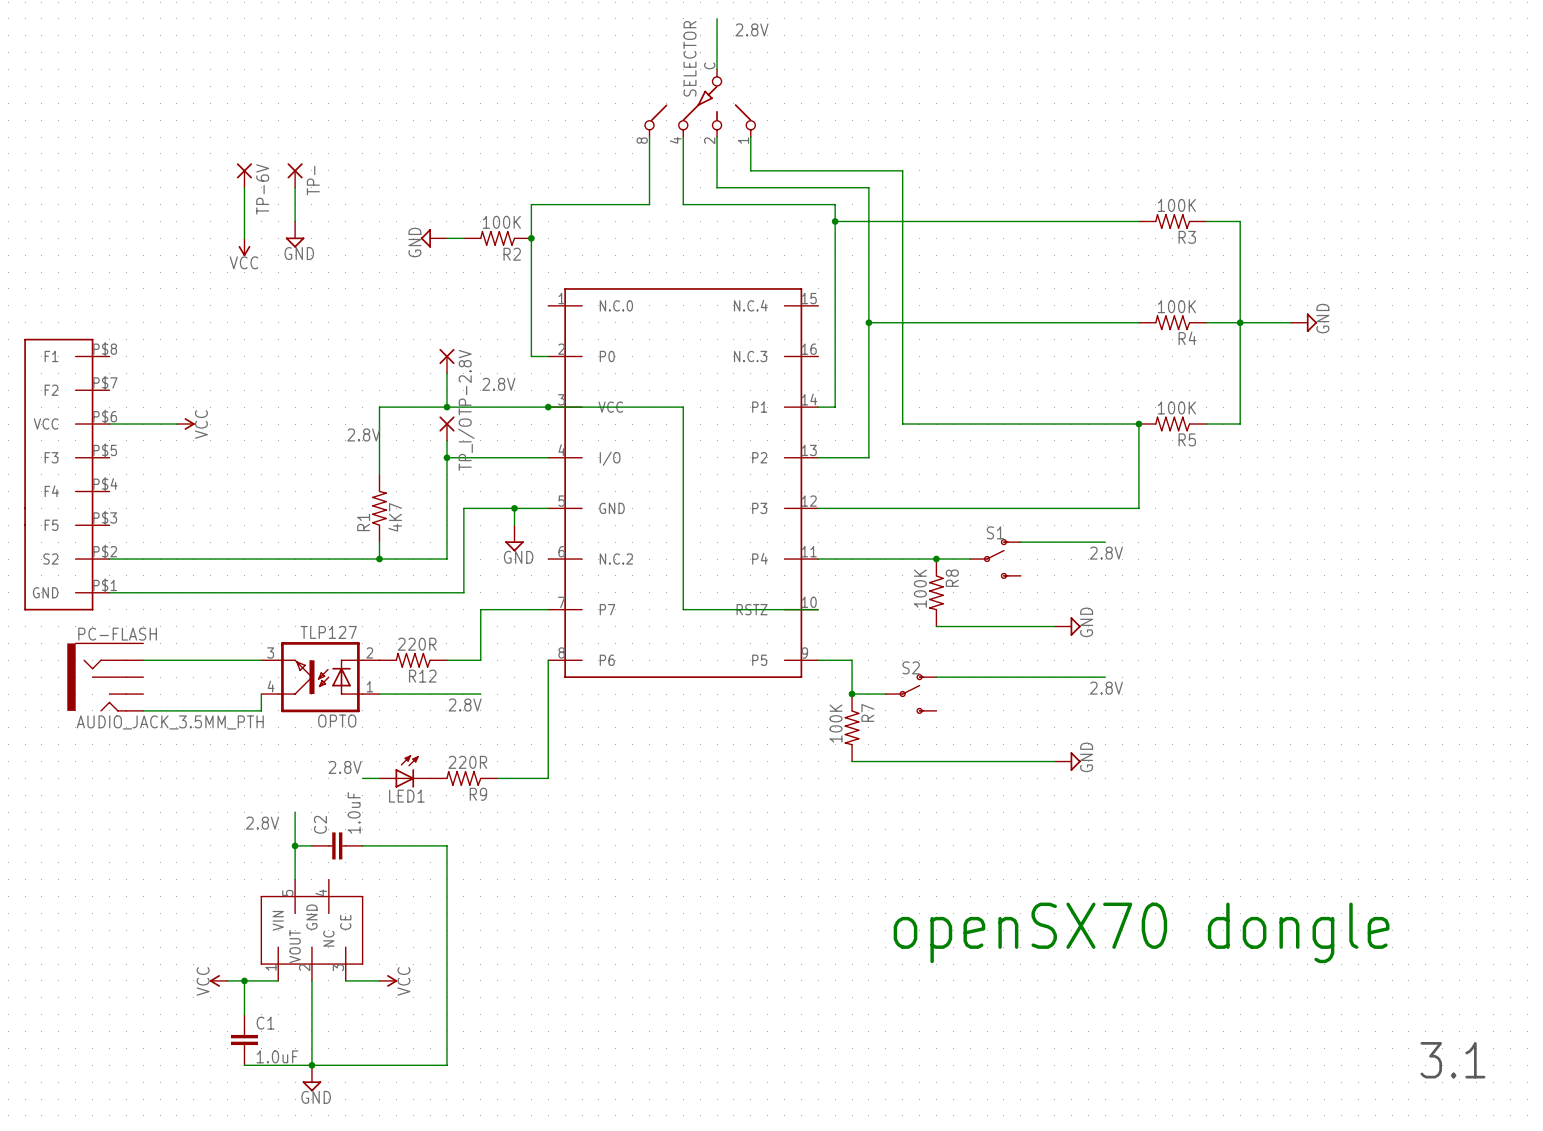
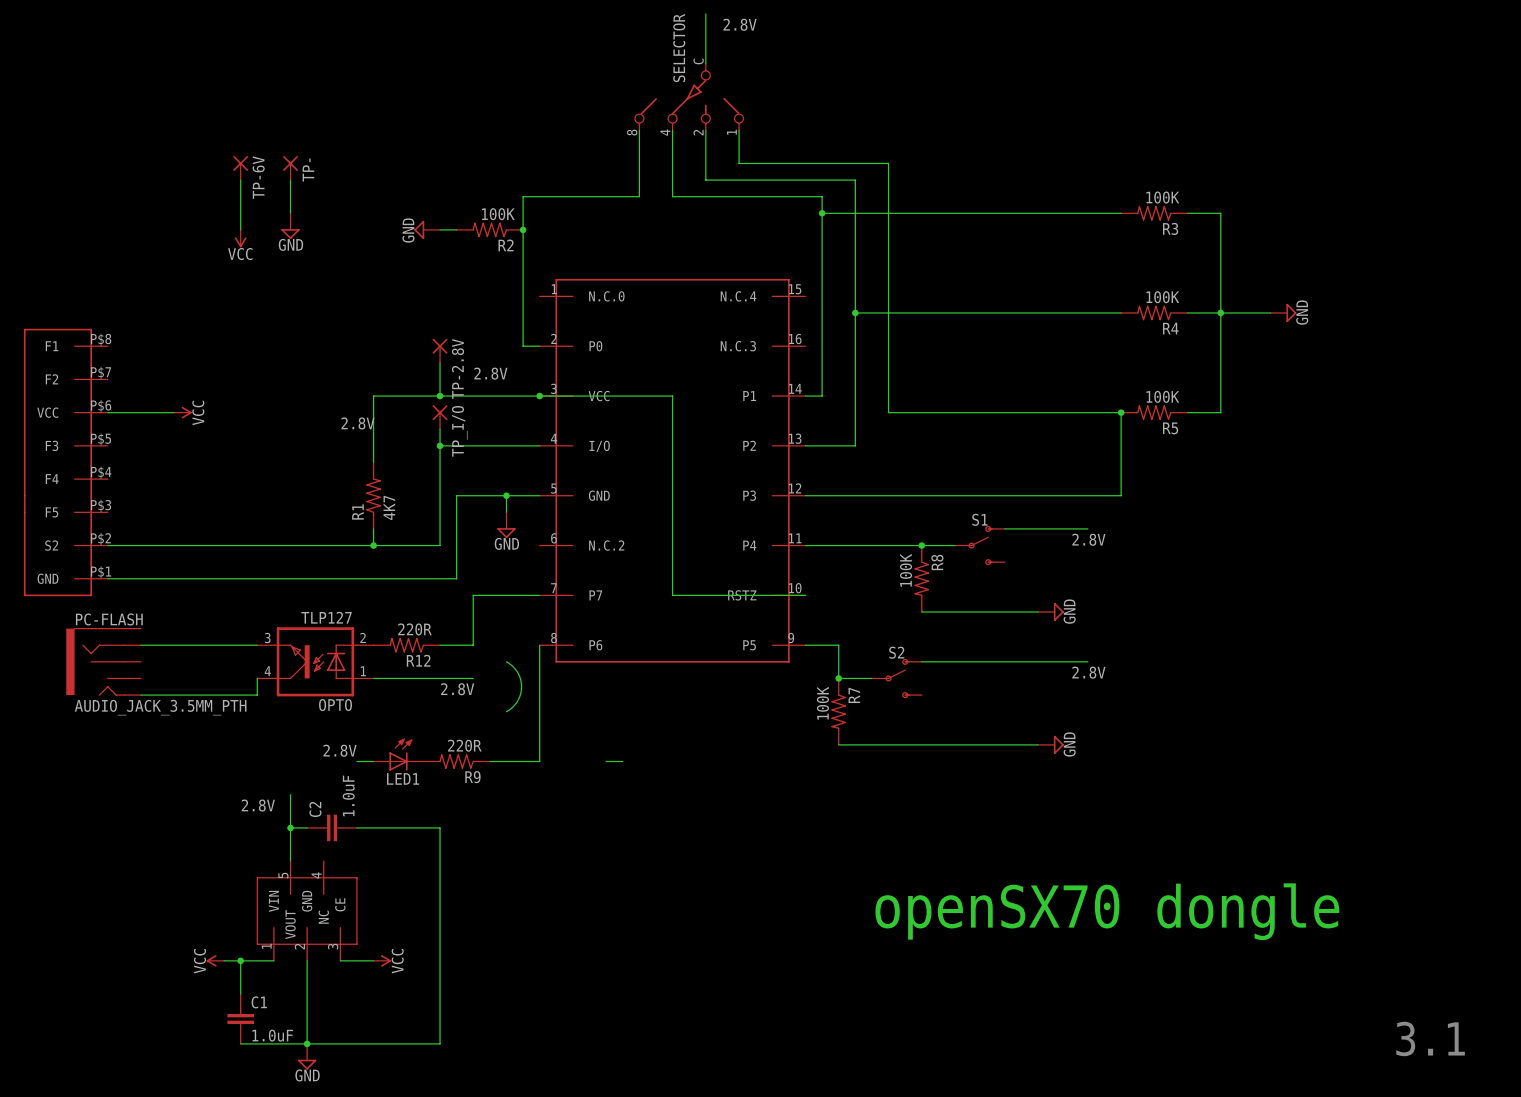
wire: none -> (506, 661) (518, 673) (521, 686) (516, 702) (506, 711)
wire: none -> (606, 761) (622, 761)

